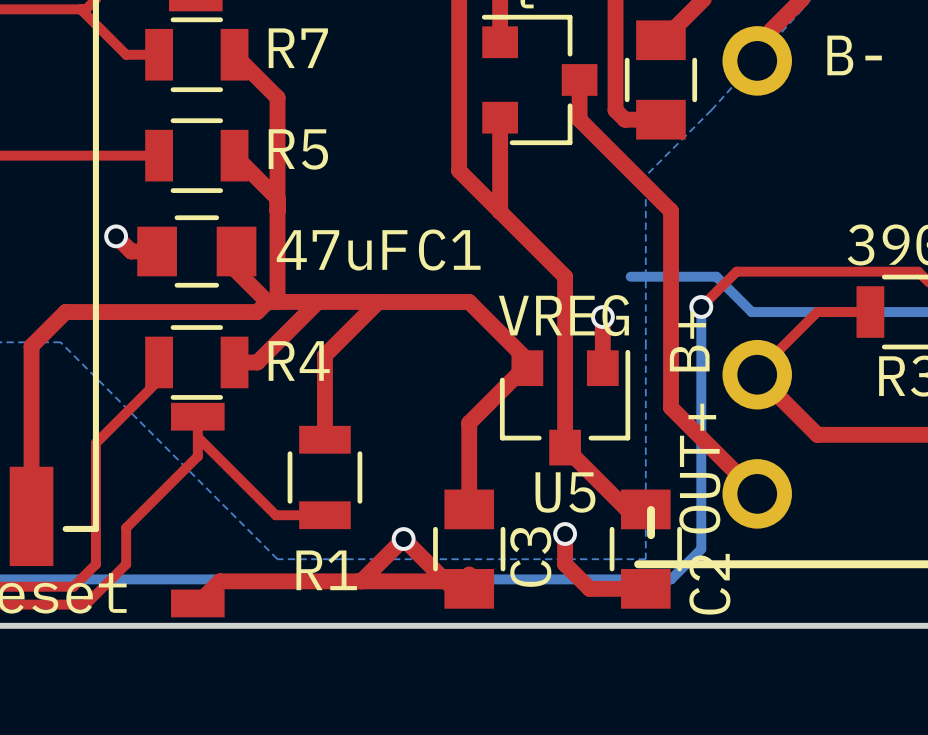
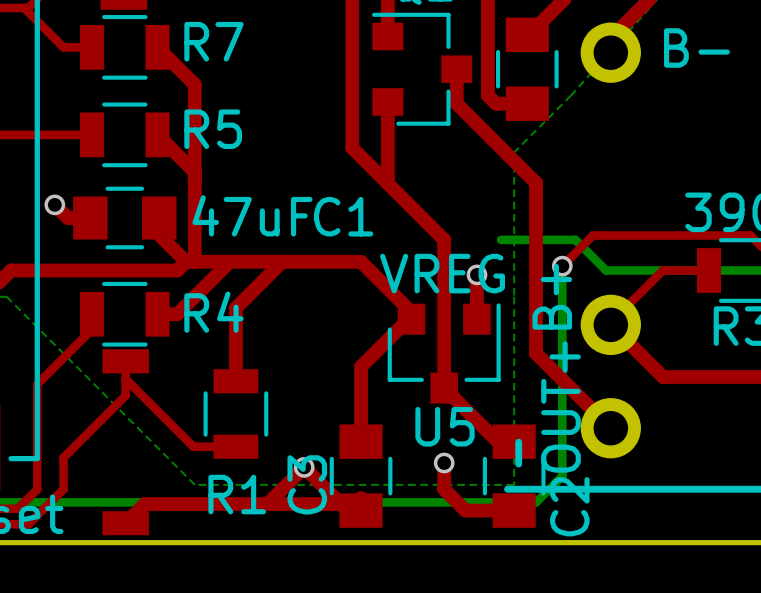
C3 name position: C3 (530, 557) -> C3 (307, 484)

